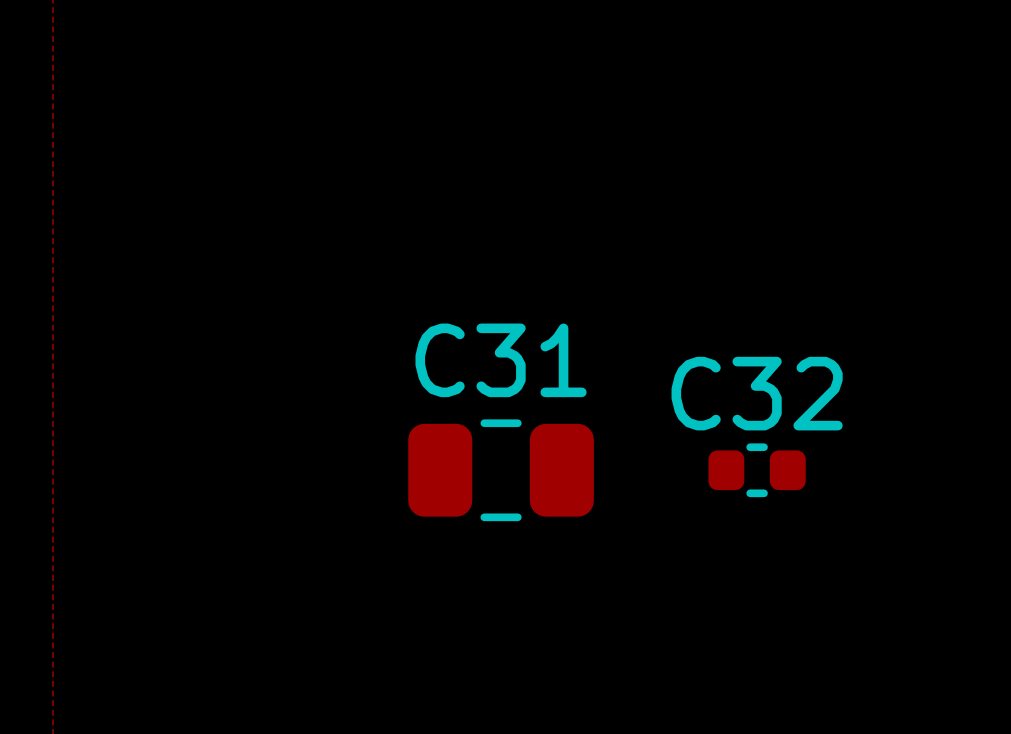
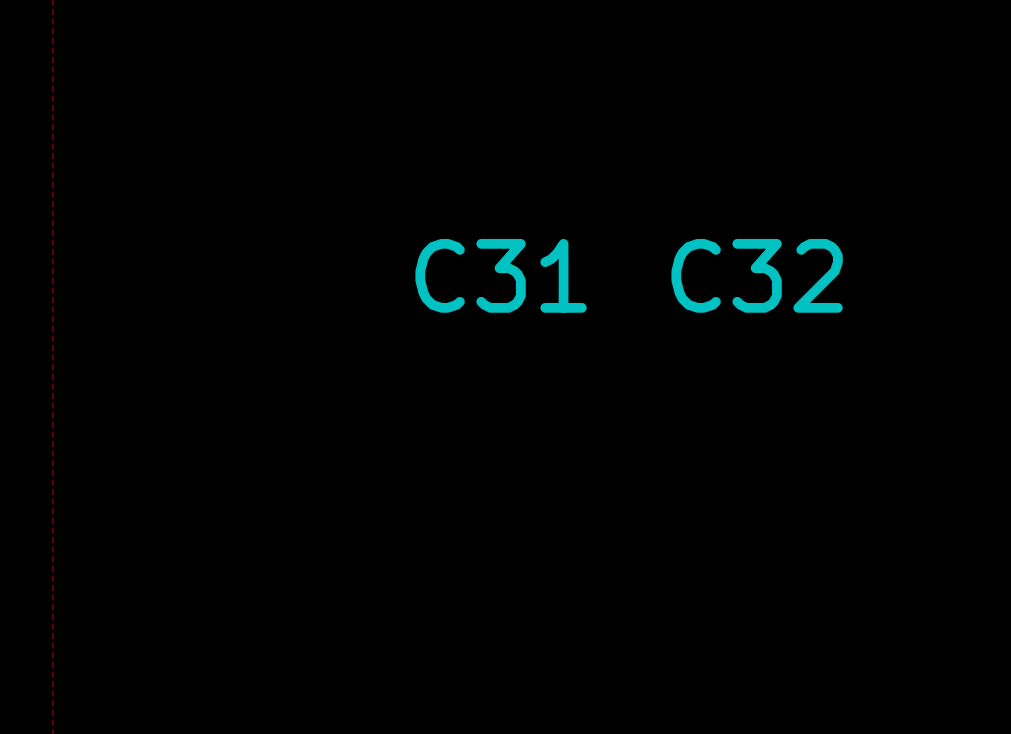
C31 footprint: [408, 419, 594, 522] -> [415, 238, 587, 313]
C32 footprint: [708, 443, 806, 498] -> [671, 238, 843, 313]

